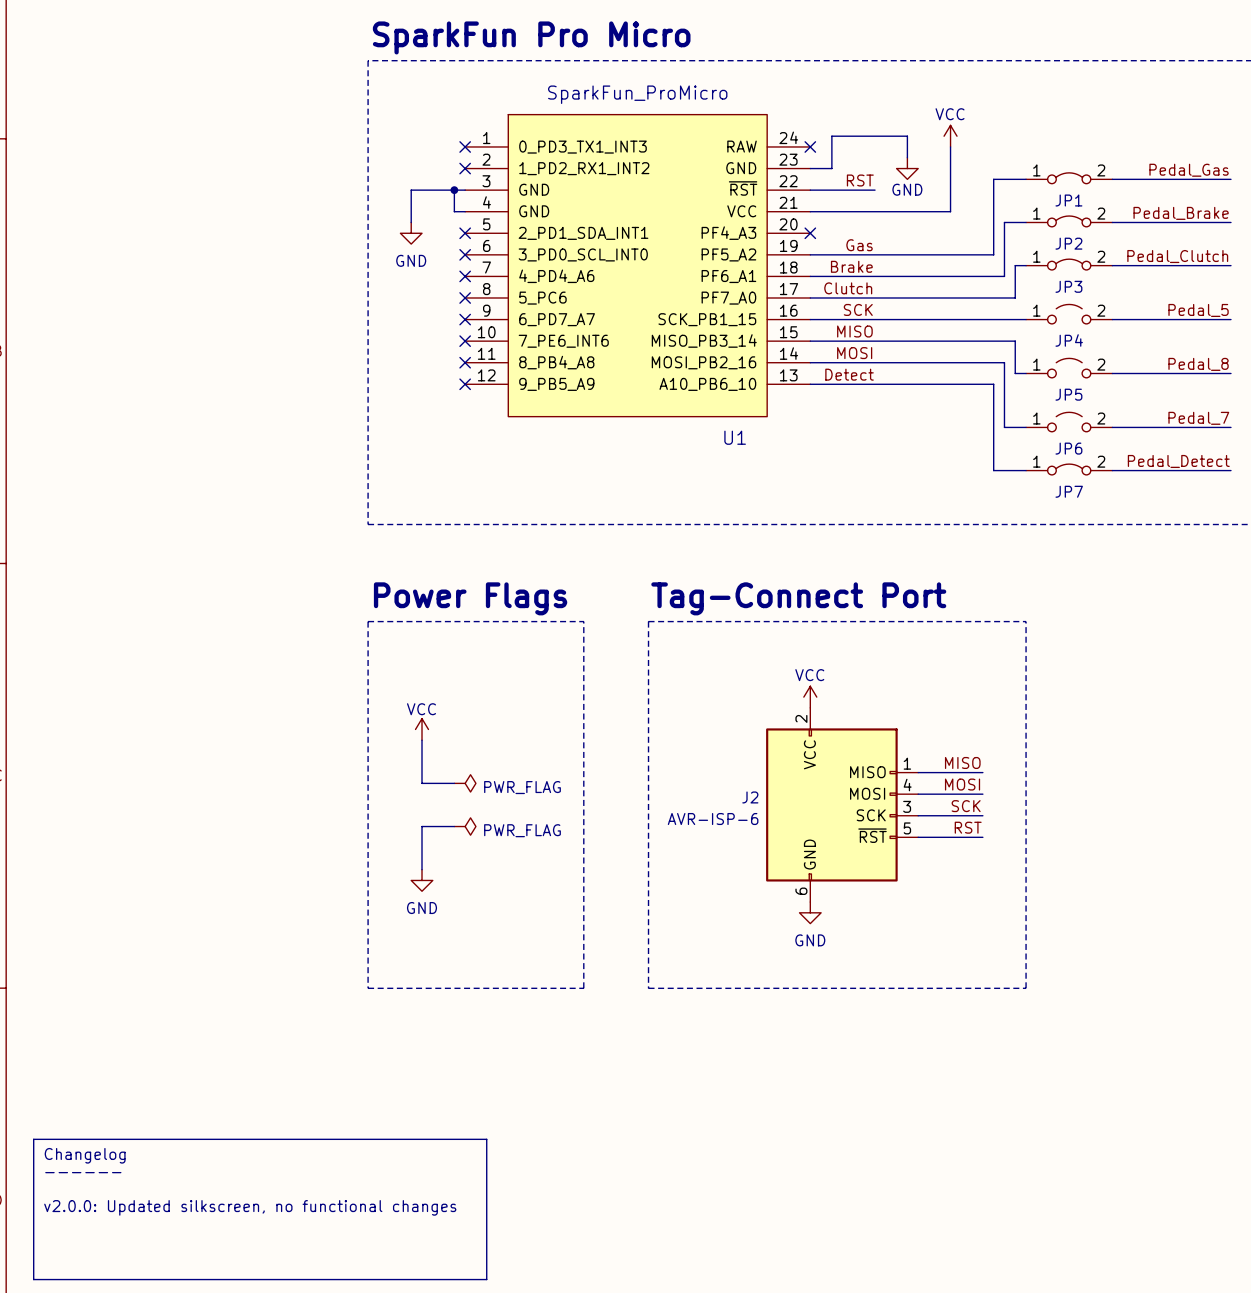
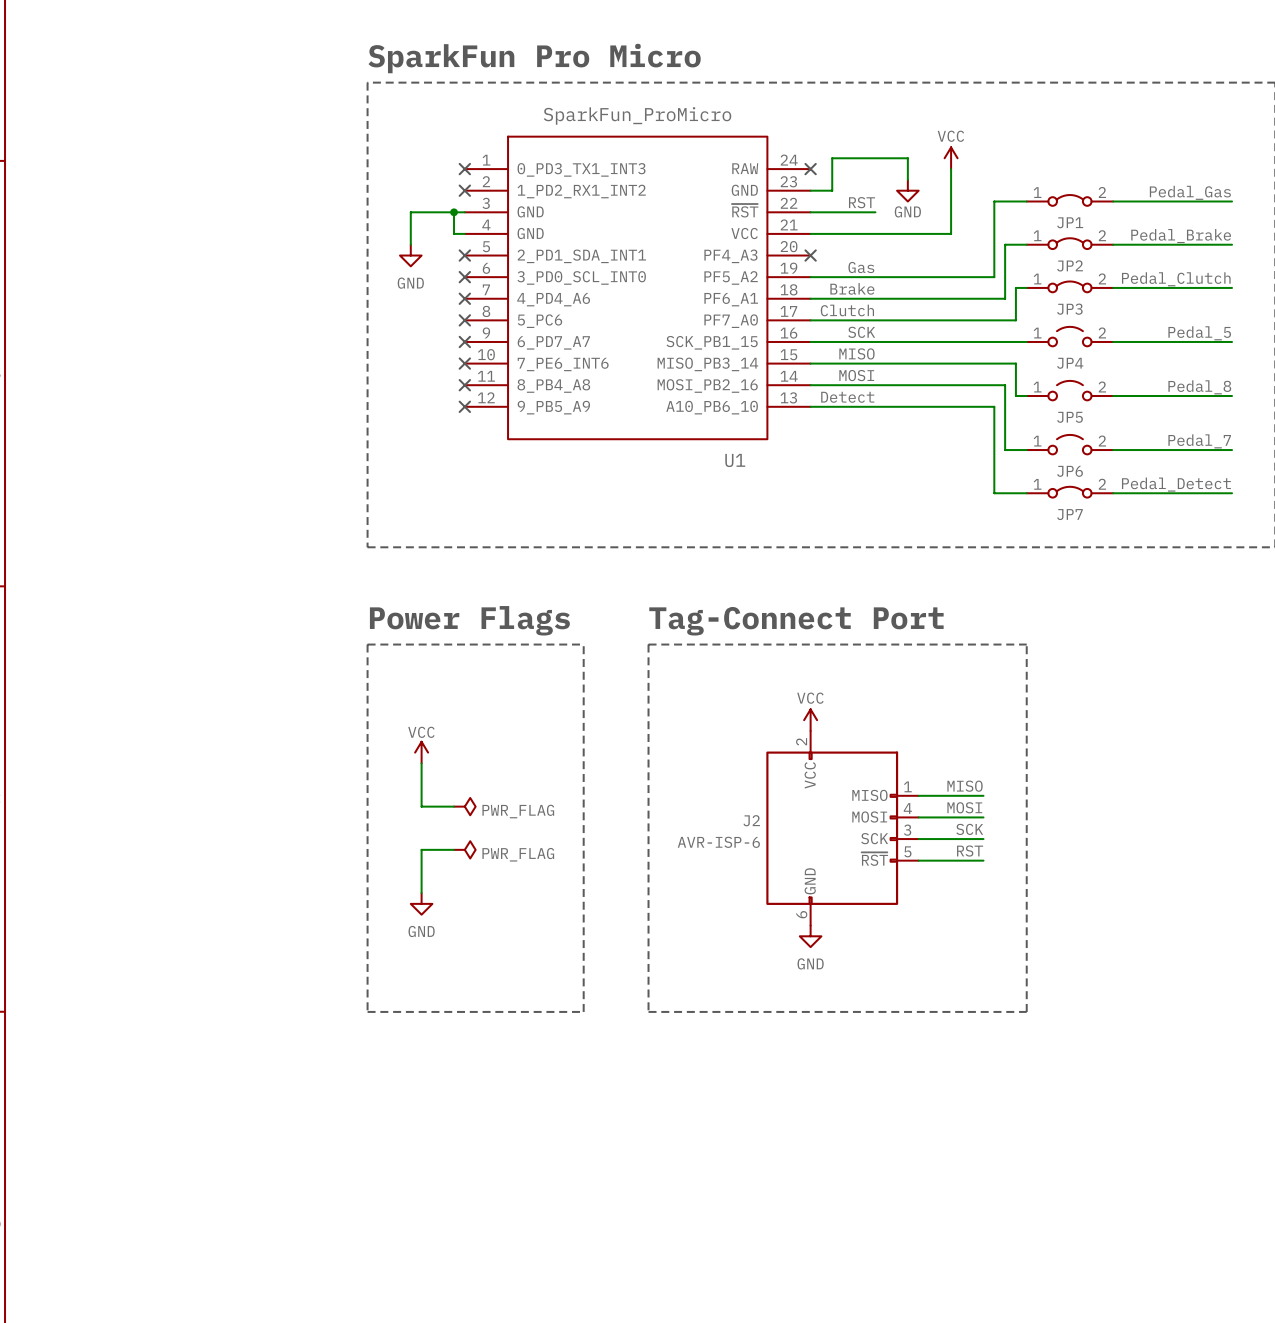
line: (33, 1139) (486, 1139) (486, 1279) (33, 1279) (33, 1139) -> none
text: Changelog (85, 1155) -> none
text: ------ (83, 1172) -> none
text: v2.0.0: Updated silkscreen, no functional changes (250, 1207) -> none

